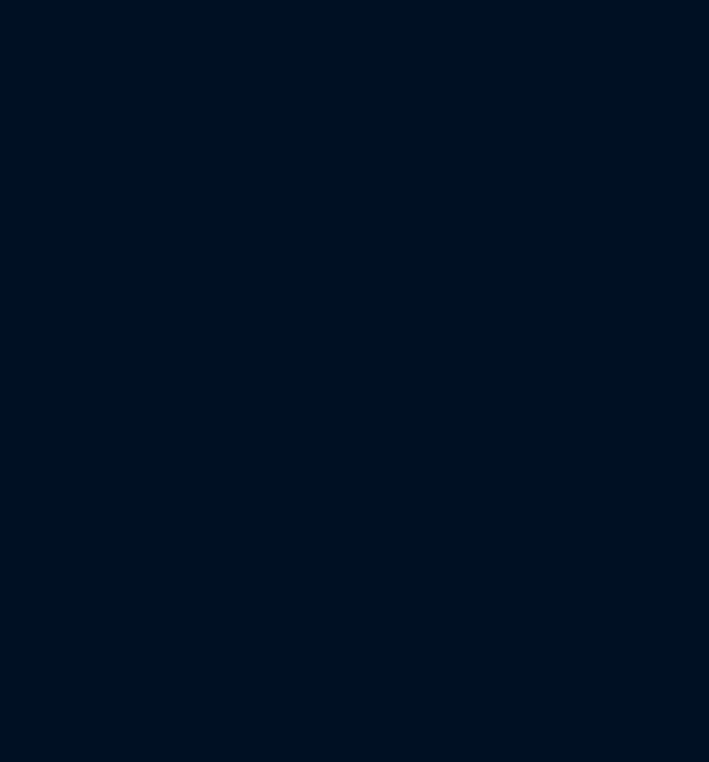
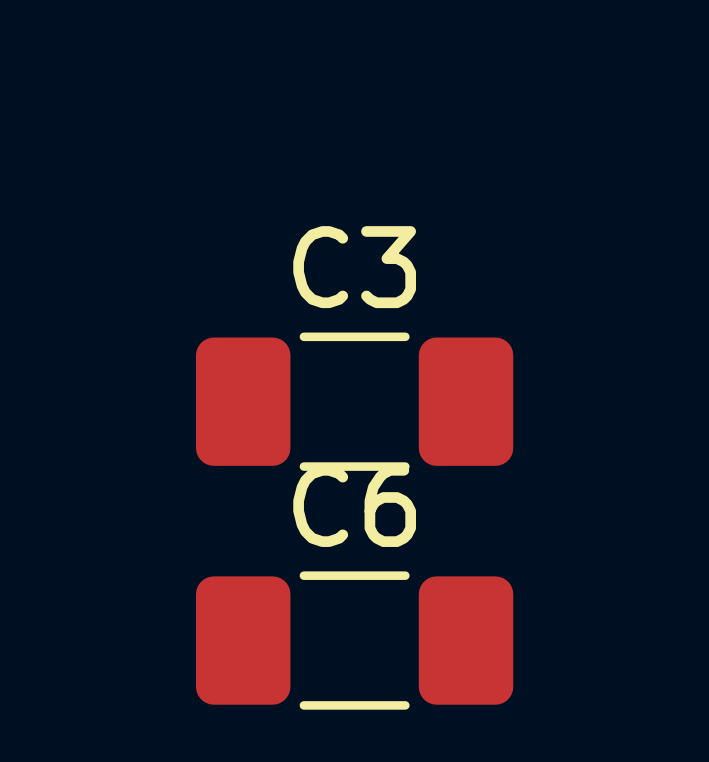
C3: none -> (354, 401)
C6: none -> (354, 640)

